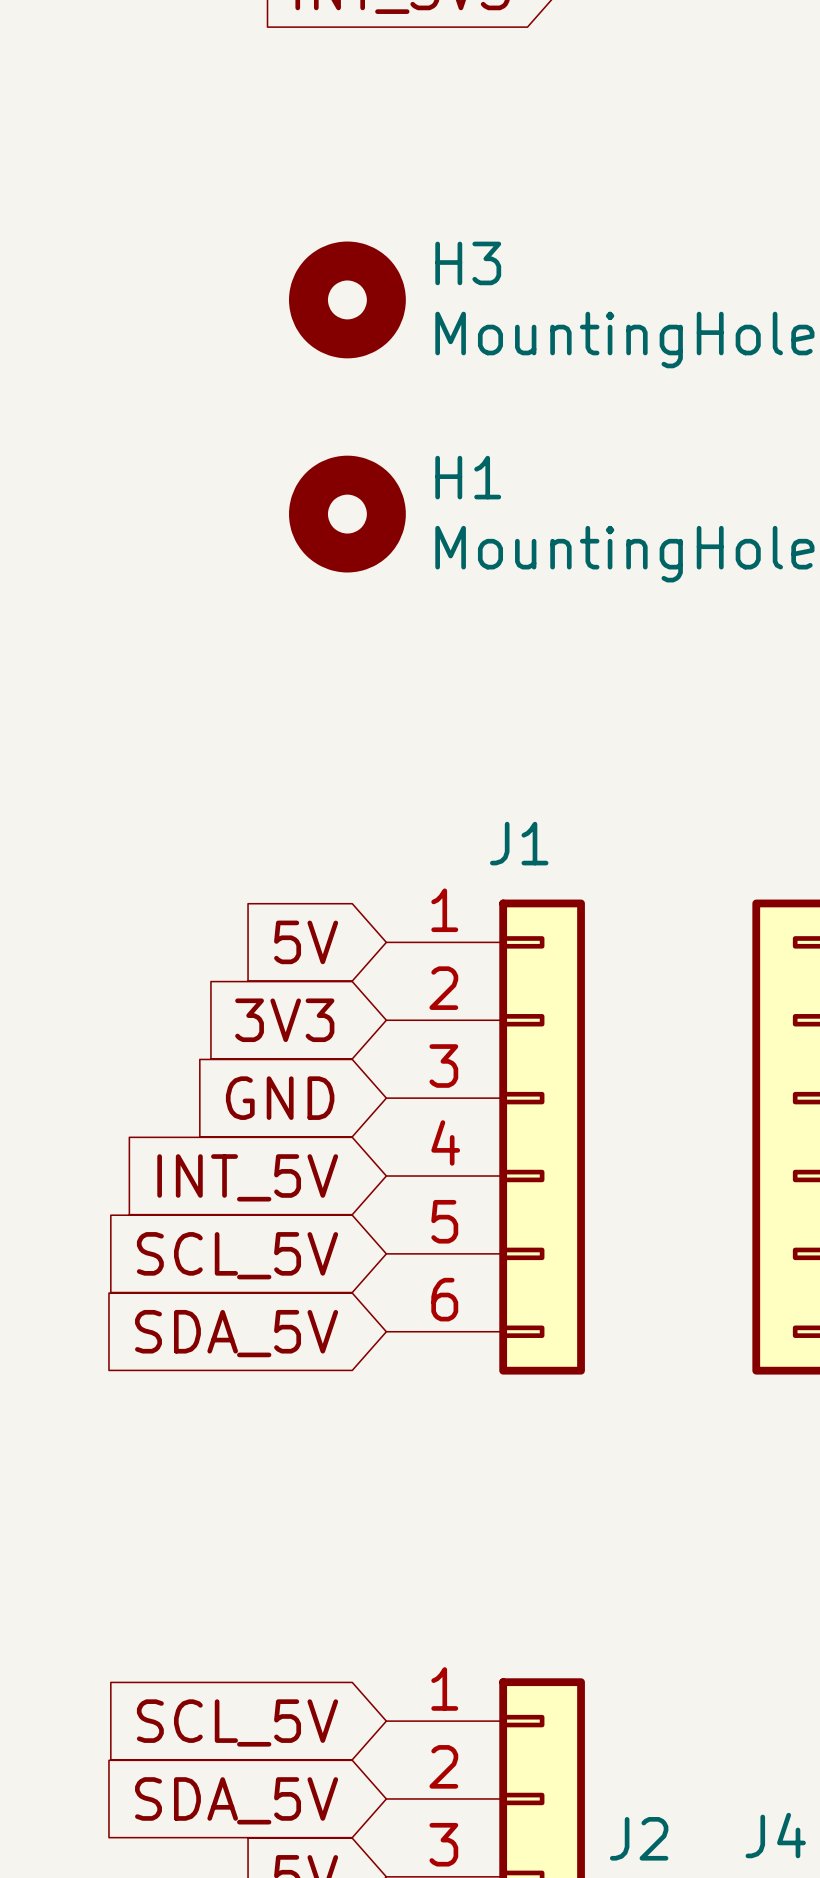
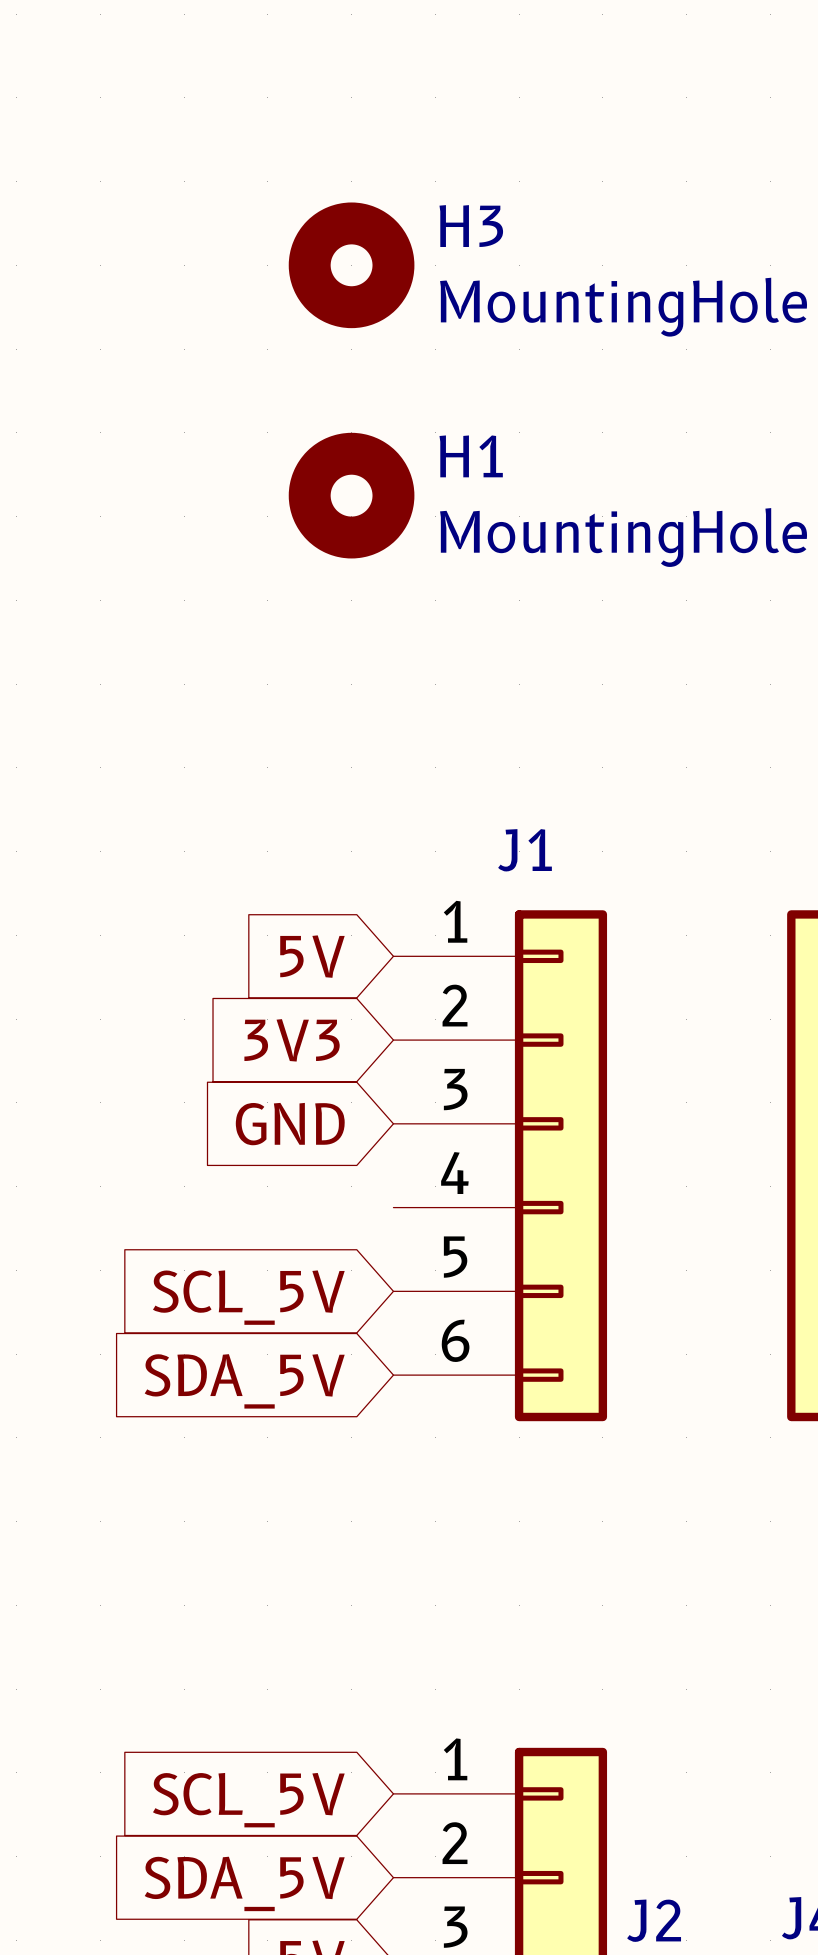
global label: INT_5V (247, 1177) -> none

